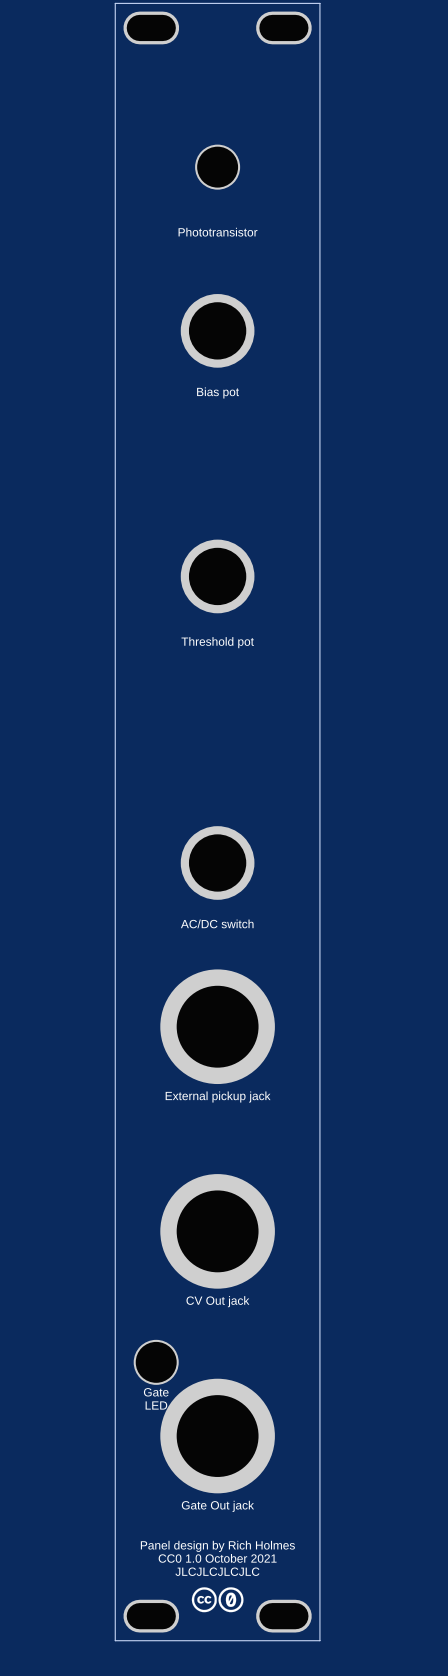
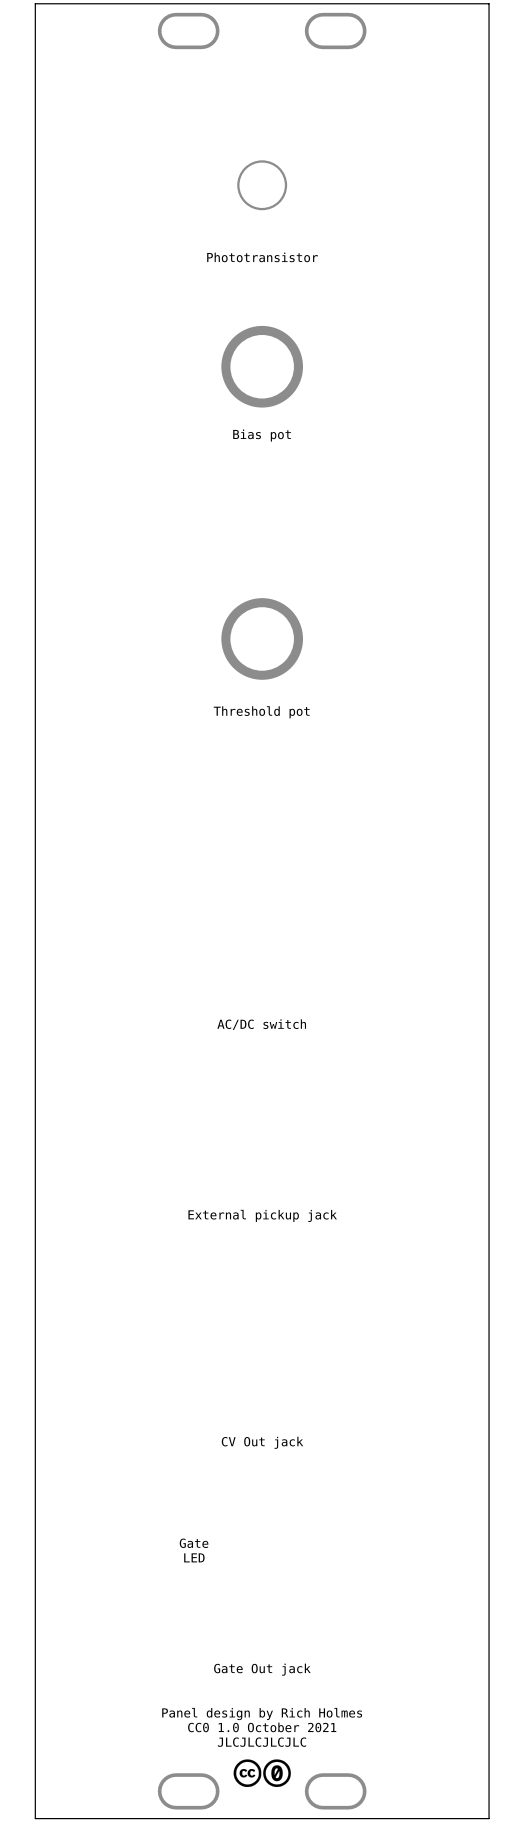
board edge: (115, 3) (115, 1640) -> (148, 3) (35, 3) (35, 1818) (148, 1818)
board edge: (319, 3) (319, 1640) -> (375, 3) (489, 3) (489, 1818) (375, 1818)
part: (217, 862) -> none
part: (217, 1026) -> none
part: (217, 1231) -> none
part: (156, 1362) -> none
part: (217, 1436) -> none

